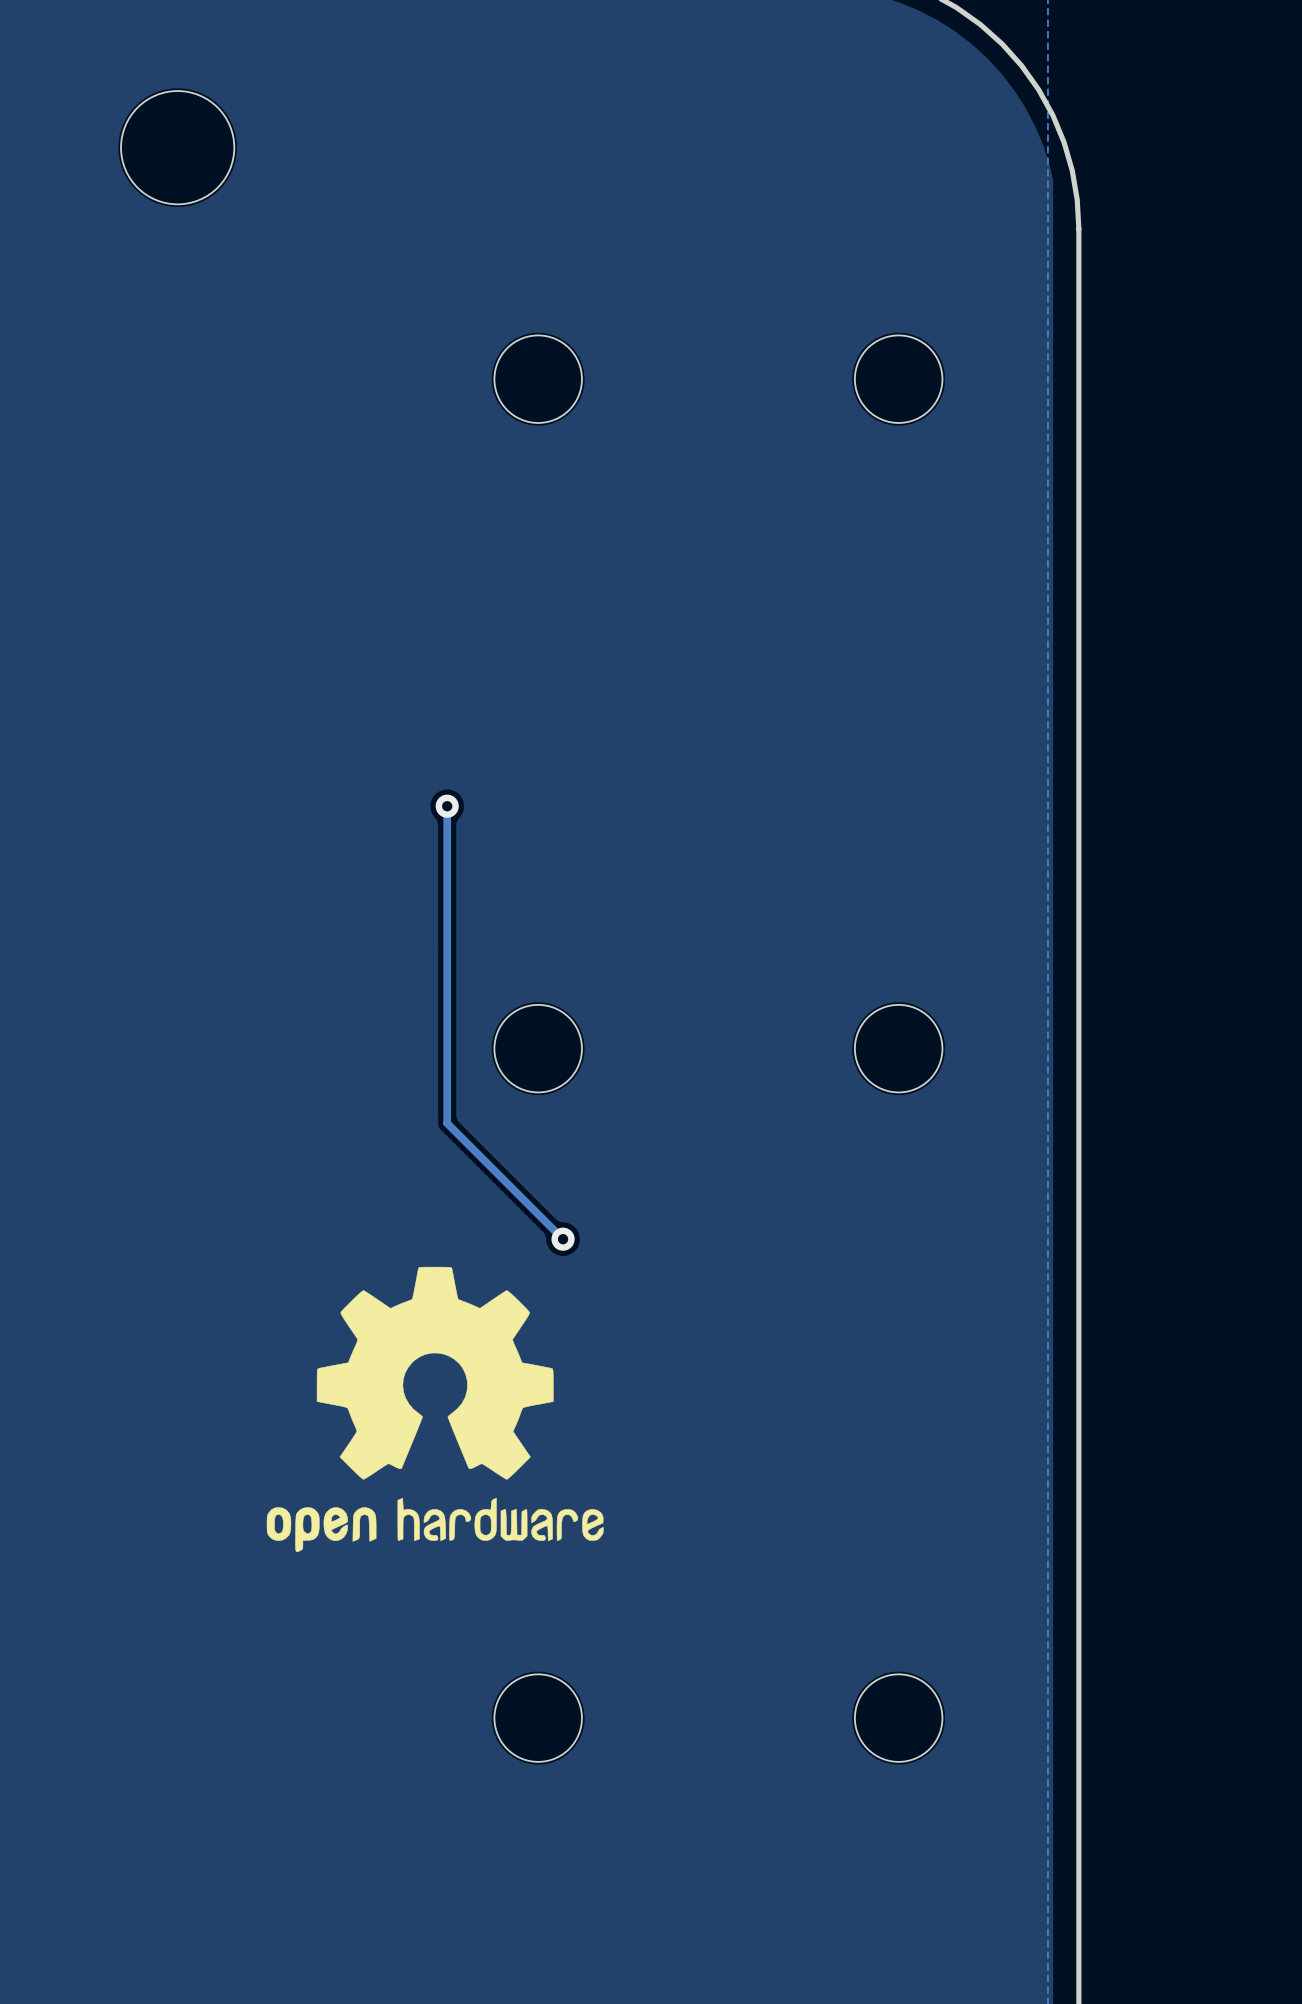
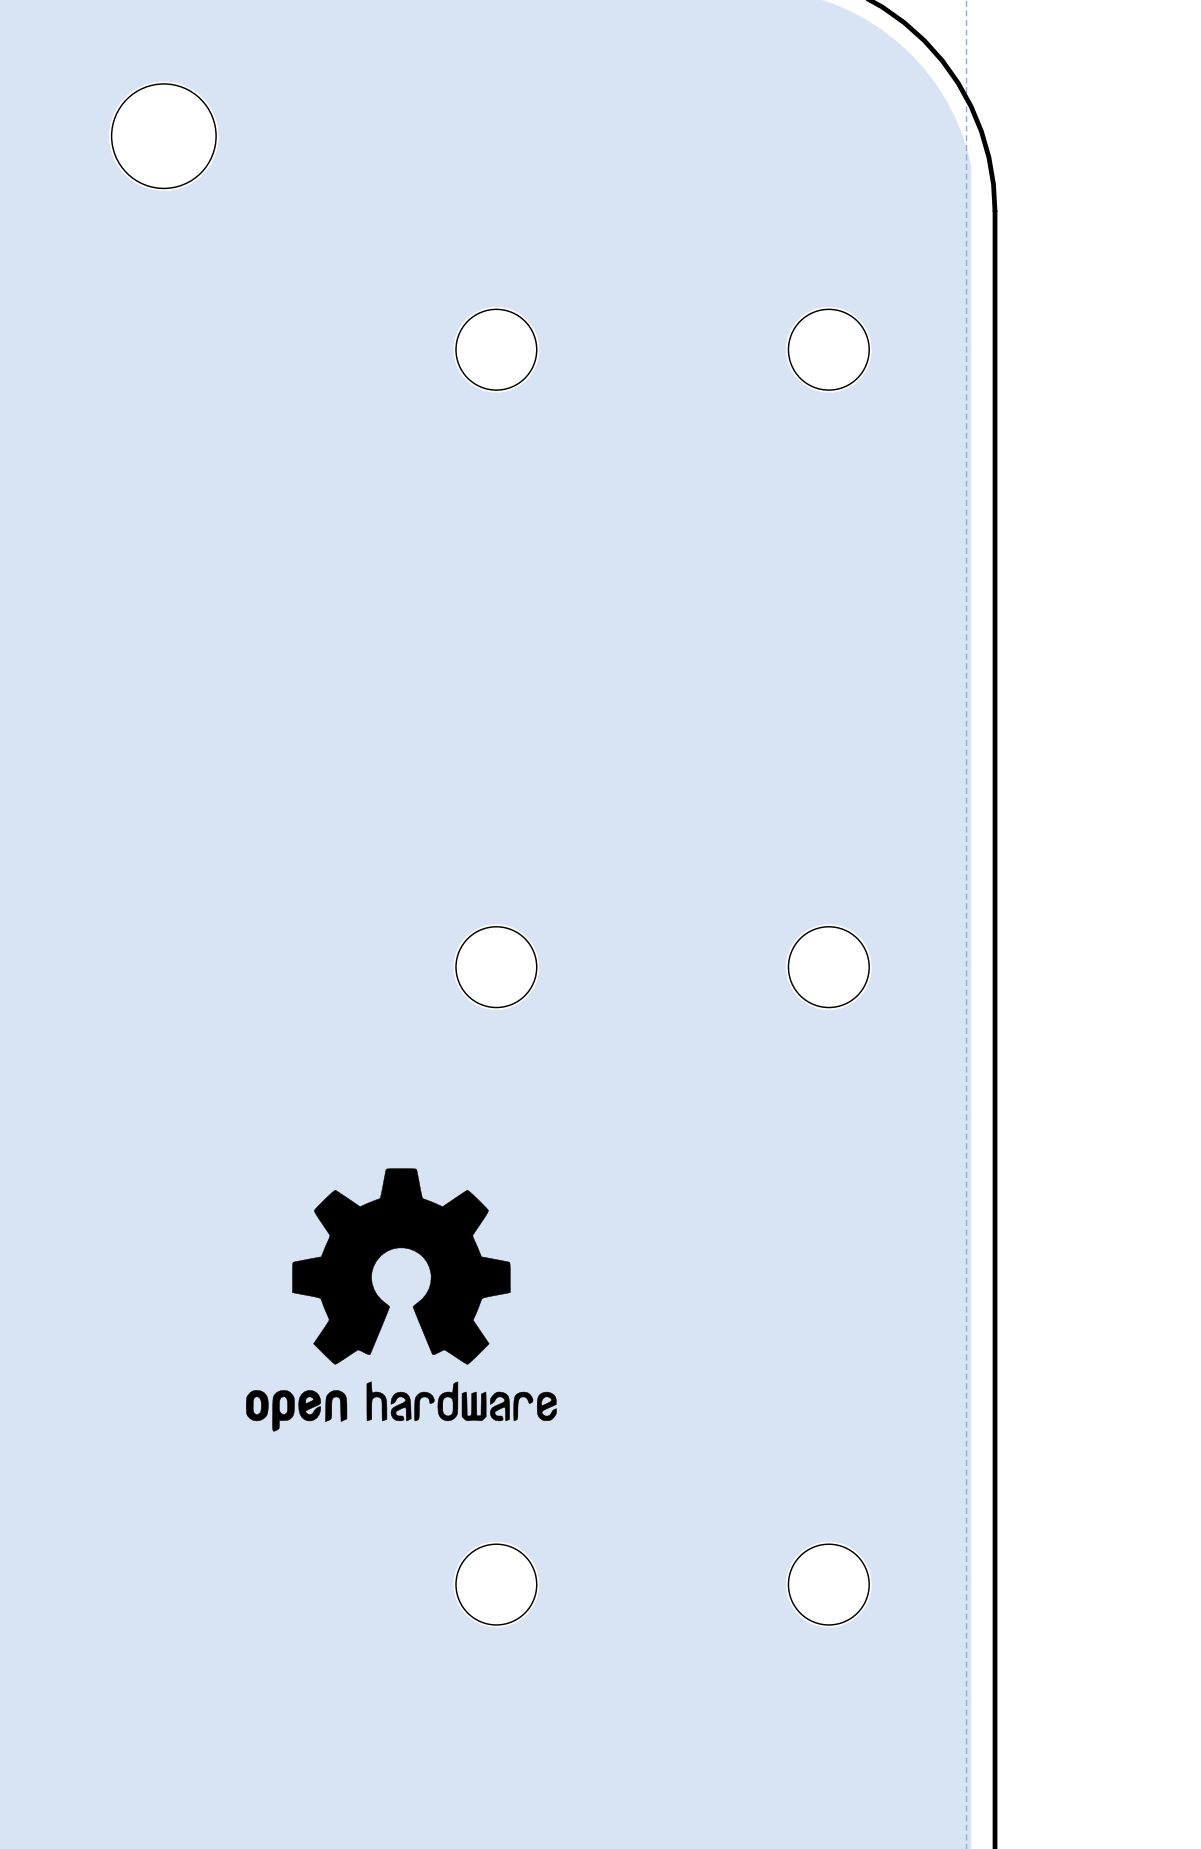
track: (447, 806) (447, 1123) (563, 1239) -> none
via: (447, 806) -> none
via: (563, 1239) -> none

